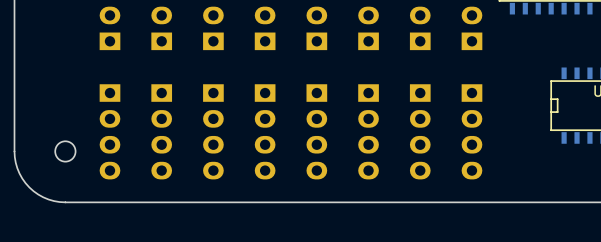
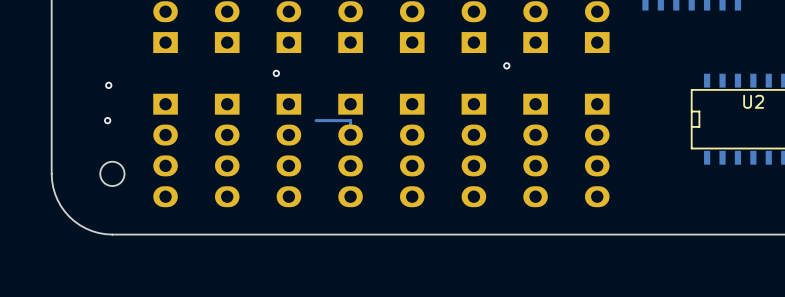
via: none -> (506, 65)
via: none -> (276, 73)
via: none -> (108, 85)
via: none -> (107, 120)
track: none -> (316, 120) (350, 120) (350, 135)

